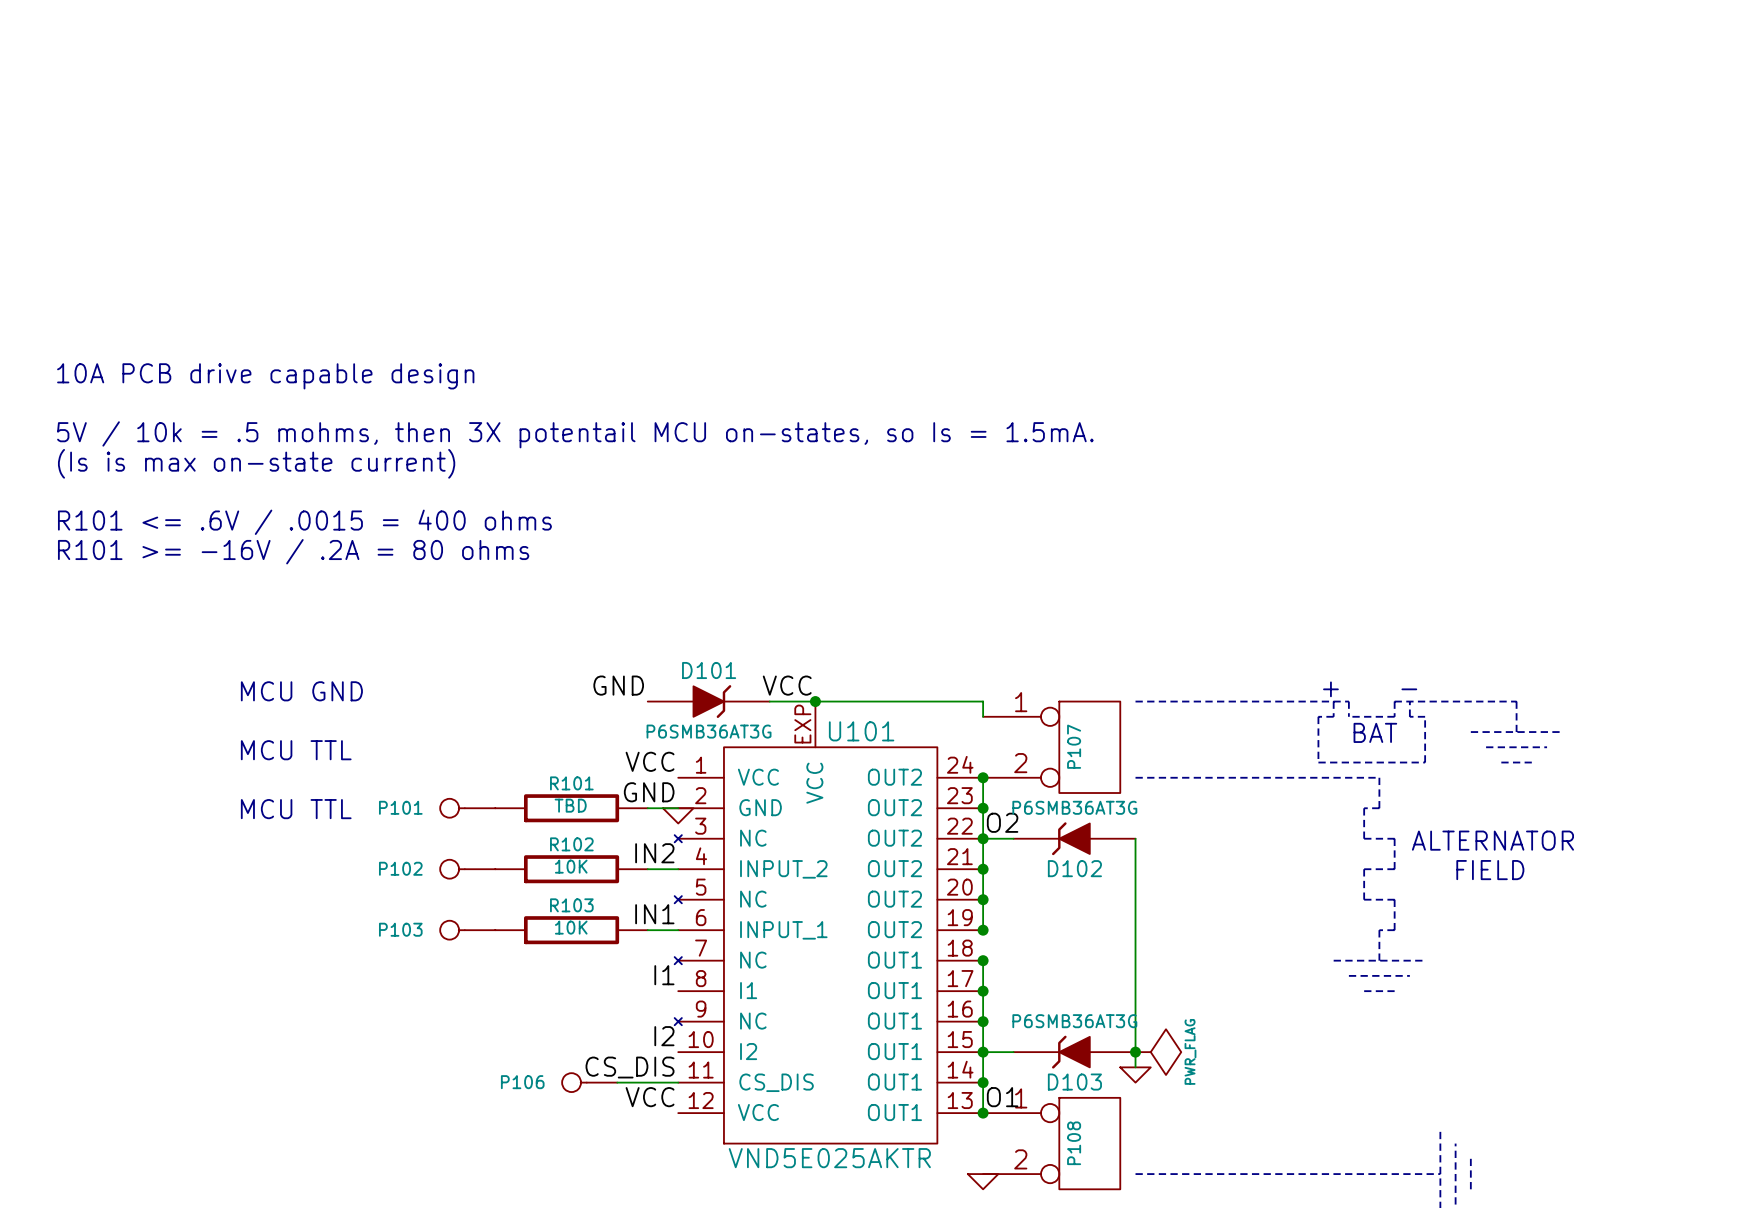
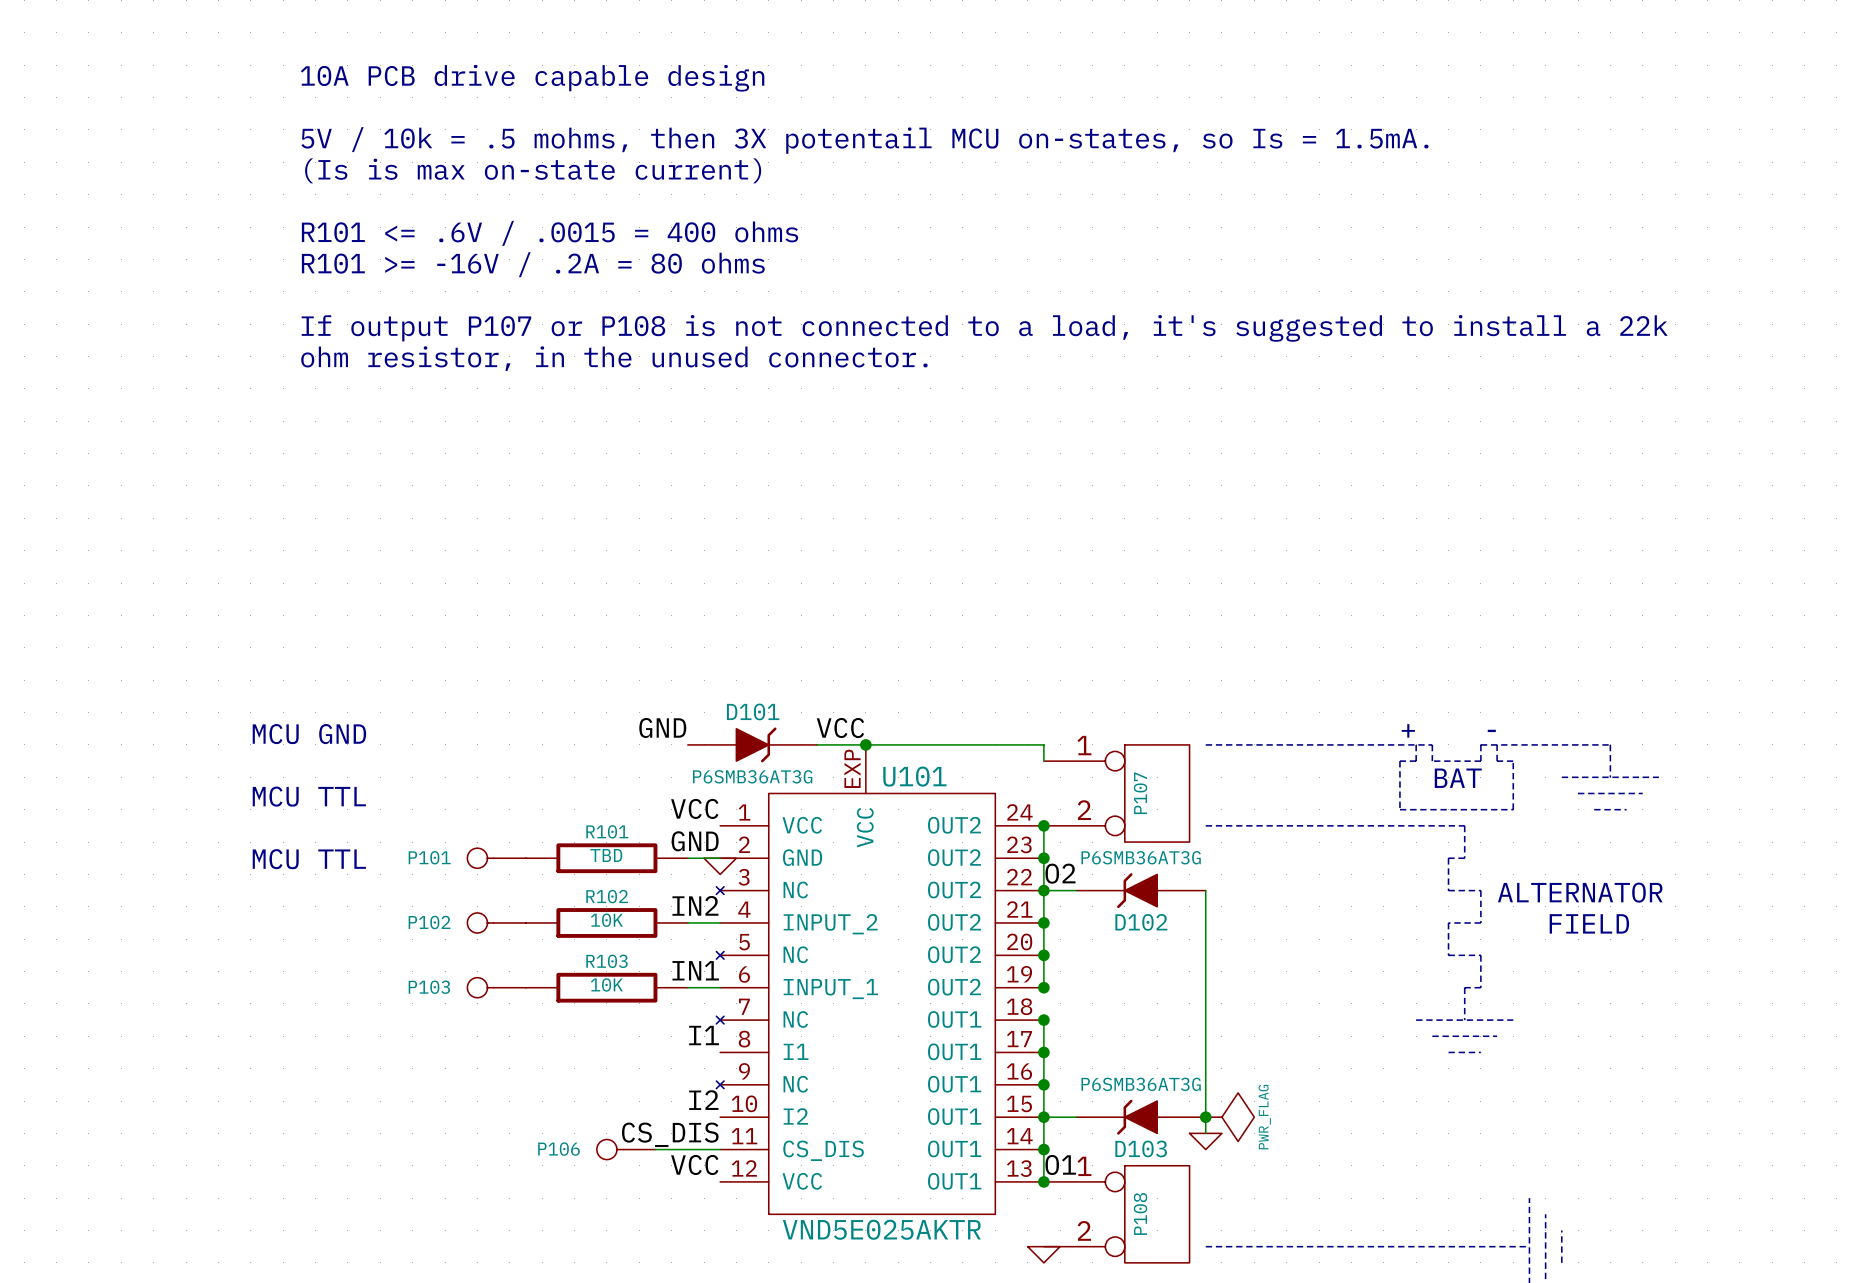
text: none -> 10A PCB drive capable design (532, 78)
text: none -> 5V / 10k = .5 mohms, then 3X potentail MCU on-states, so Is = 1.5mA. (864, 140)
text: none -> (Is is max on-state current) (533, 170)
text: none -> R101 <= .6V / .0015 = 400 ohms (550, 233)
text: none -> R101 >= -16V / .2A = 80 ohms (533, 264)
text: none -> If output P107 or P108 is not connected to a load, it's suggested to install a 22k (984, 328)
text: none -> ohm resistor, in the unused connector. (614, 358)
text: 10A PCB drive capable design (265, 376) -> none
text: 5V / 10k = .5 mohms, then 3X potentail MCU on-states, so Is = 1.5mA. (575, 434) -> none
text: (Is is max on-state current) (256, 463) -> none
text: R101 <= .6V / .0015 = 400 ohms (304, 522) -> none
text: R101 >= -16V / .2A = 80 ohms (293, 551) -> none

